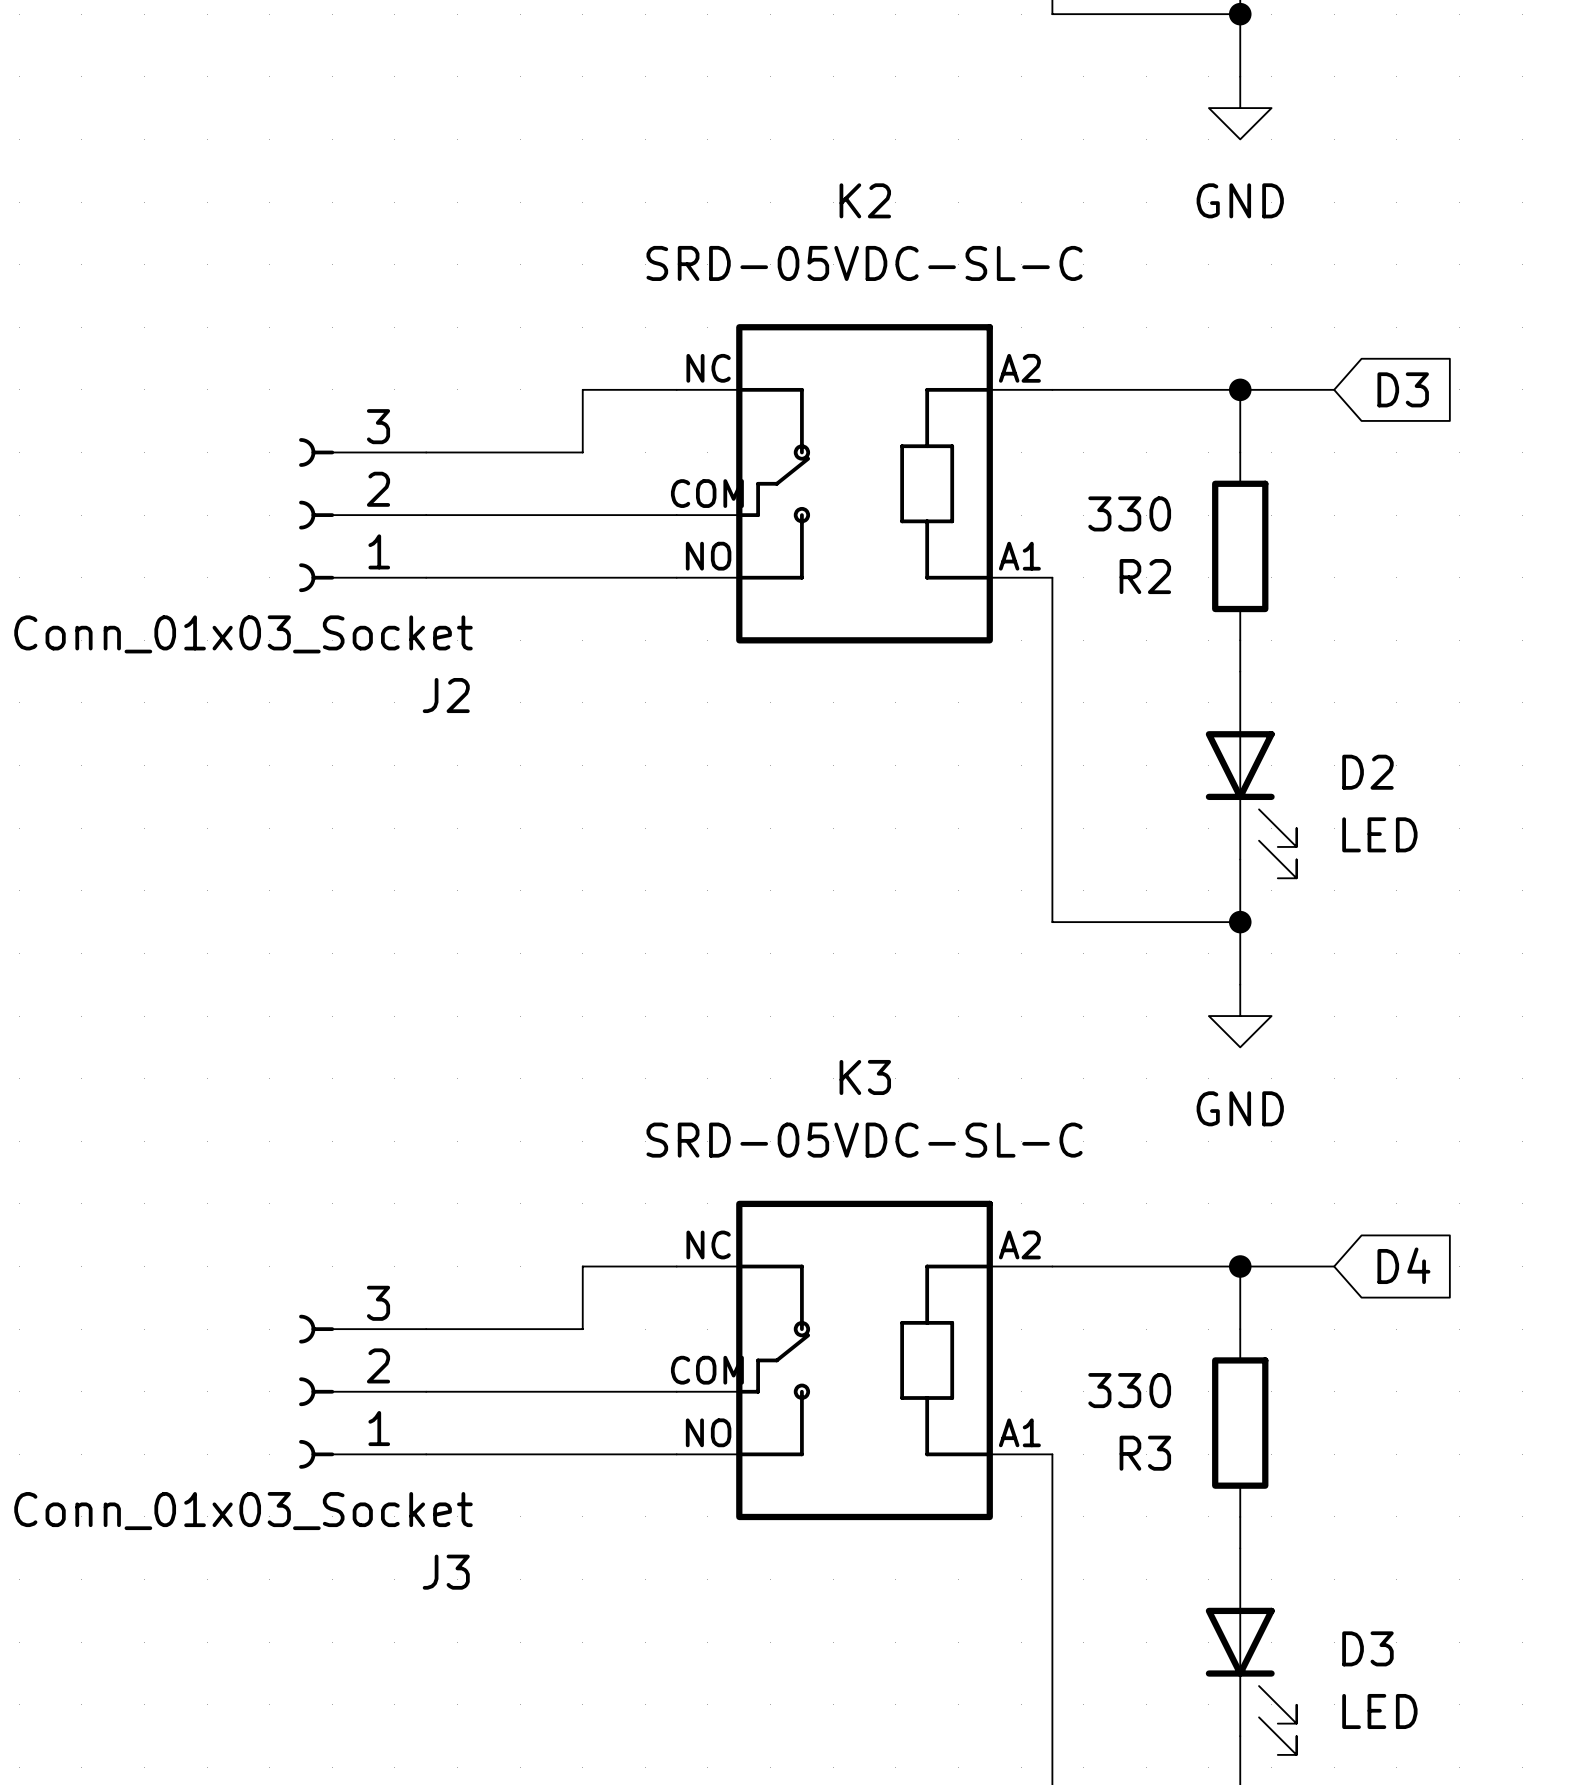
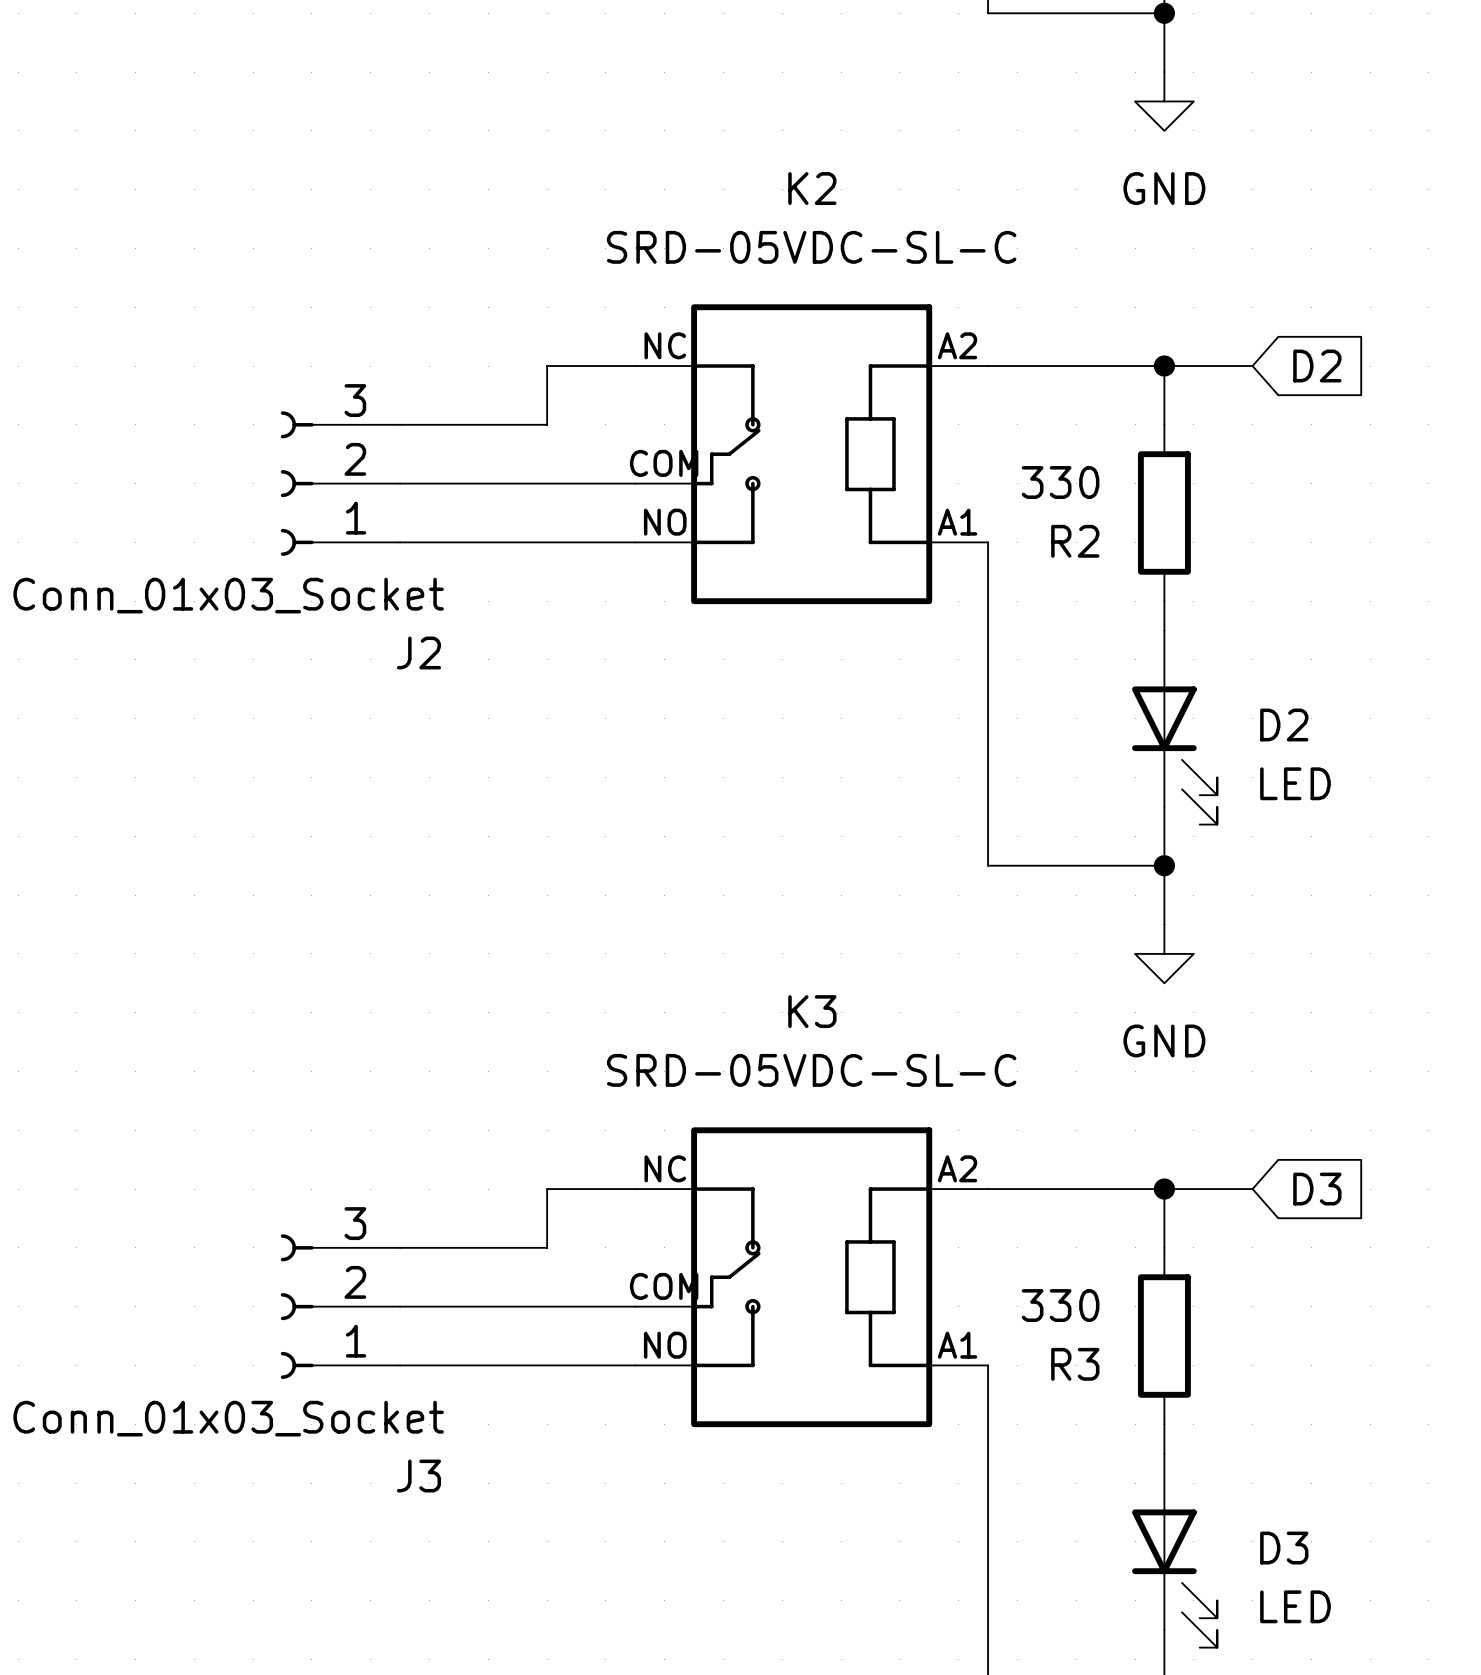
global label: D3 (1403, 389) -> D2 (1317, 366)
global label: D4 (1403, 1265) -> D3 (1317, 1189)

